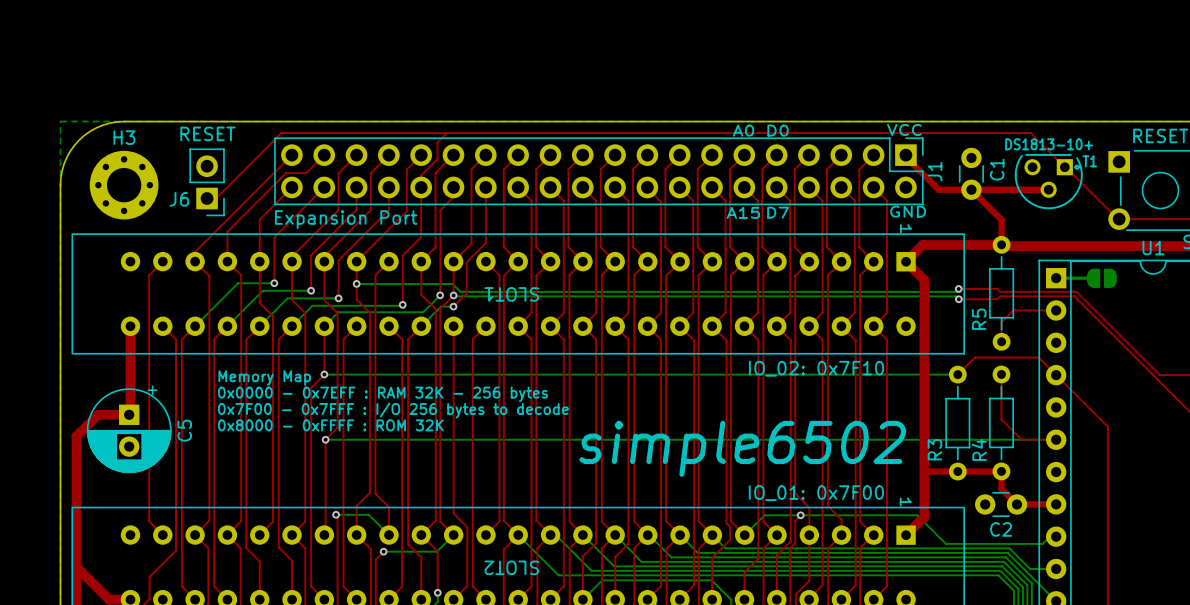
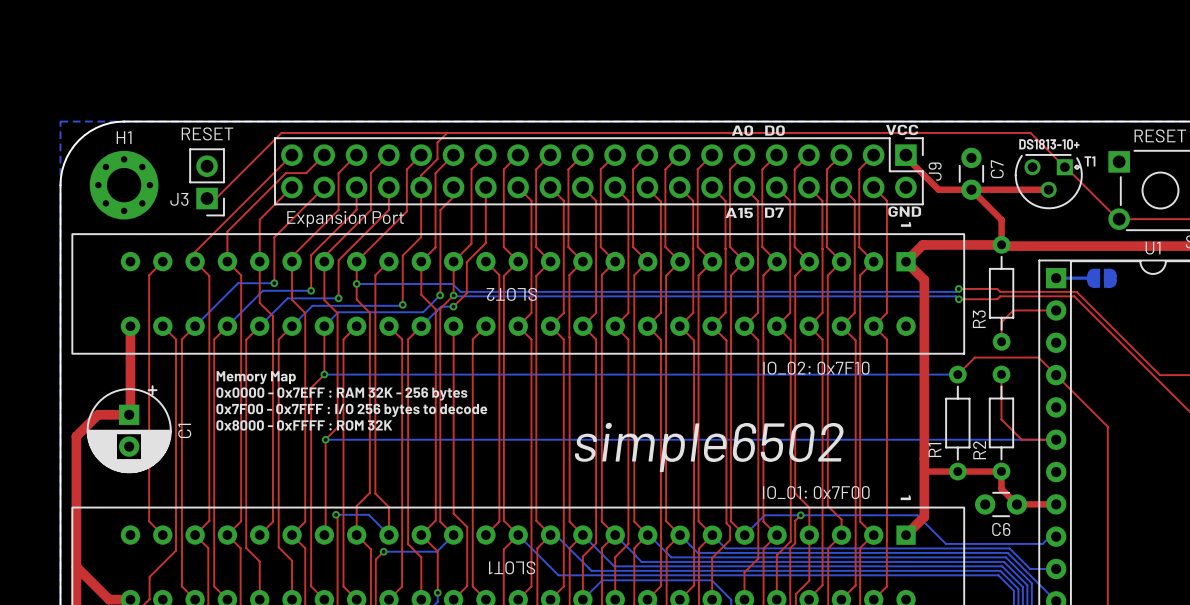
H3 name: H3 (124, 137) -> H1 (124, 137)
C1 name: C1 (997, 169) -> C7 (997, 169)
J1 name: J1 (935, 171) -> J9 (935, 171)
J6 name: J6 (179, 199) -> J3 (179, 199)
SLOT1 name: SLOT1 (511, 294) -> SLOT2 (511, 294)
R5 name: R5 (979, 319) -> R3 (979, 319)
C5 name: C5 (184, 430) -> C1 (184, 430)
R3 name: R3 (934, 449) -> R1 (934, 450)
R4 name: R4 (979, 449) -> R2 (979, 450)
C2 name: C2 (1001, 529) -> C6 (1001, 529)
SLOT2 name: SLOT2 (511, 567) -> SLOT1 (512, 567)

